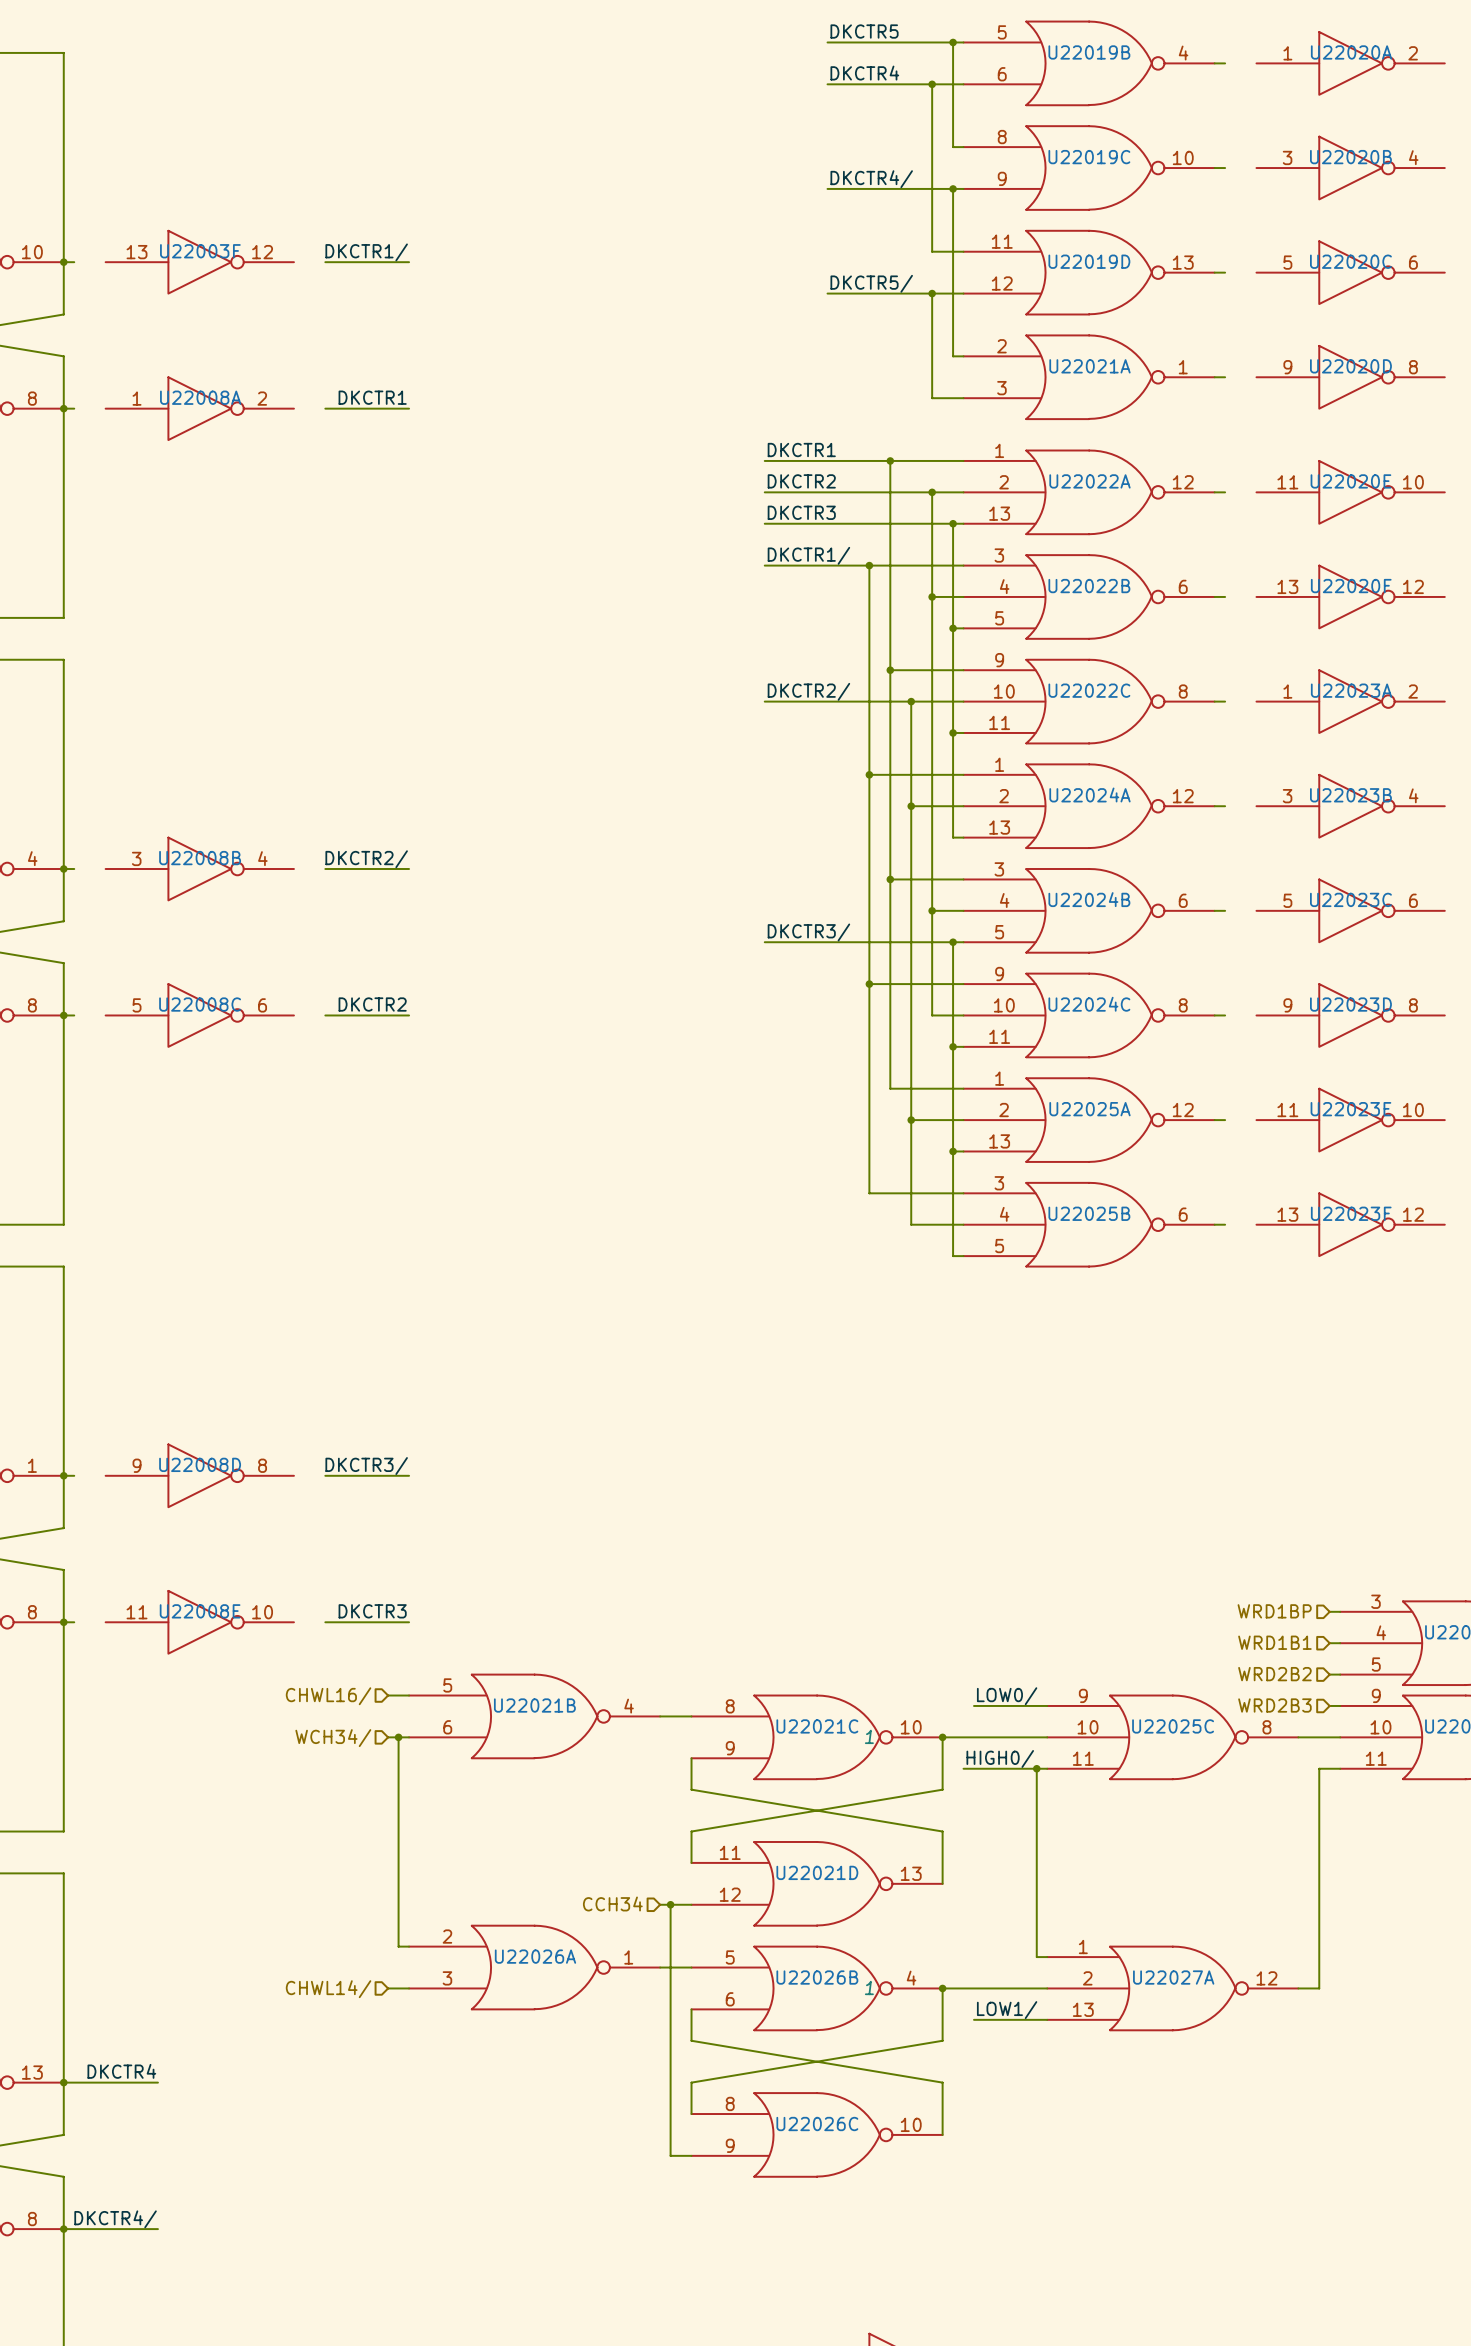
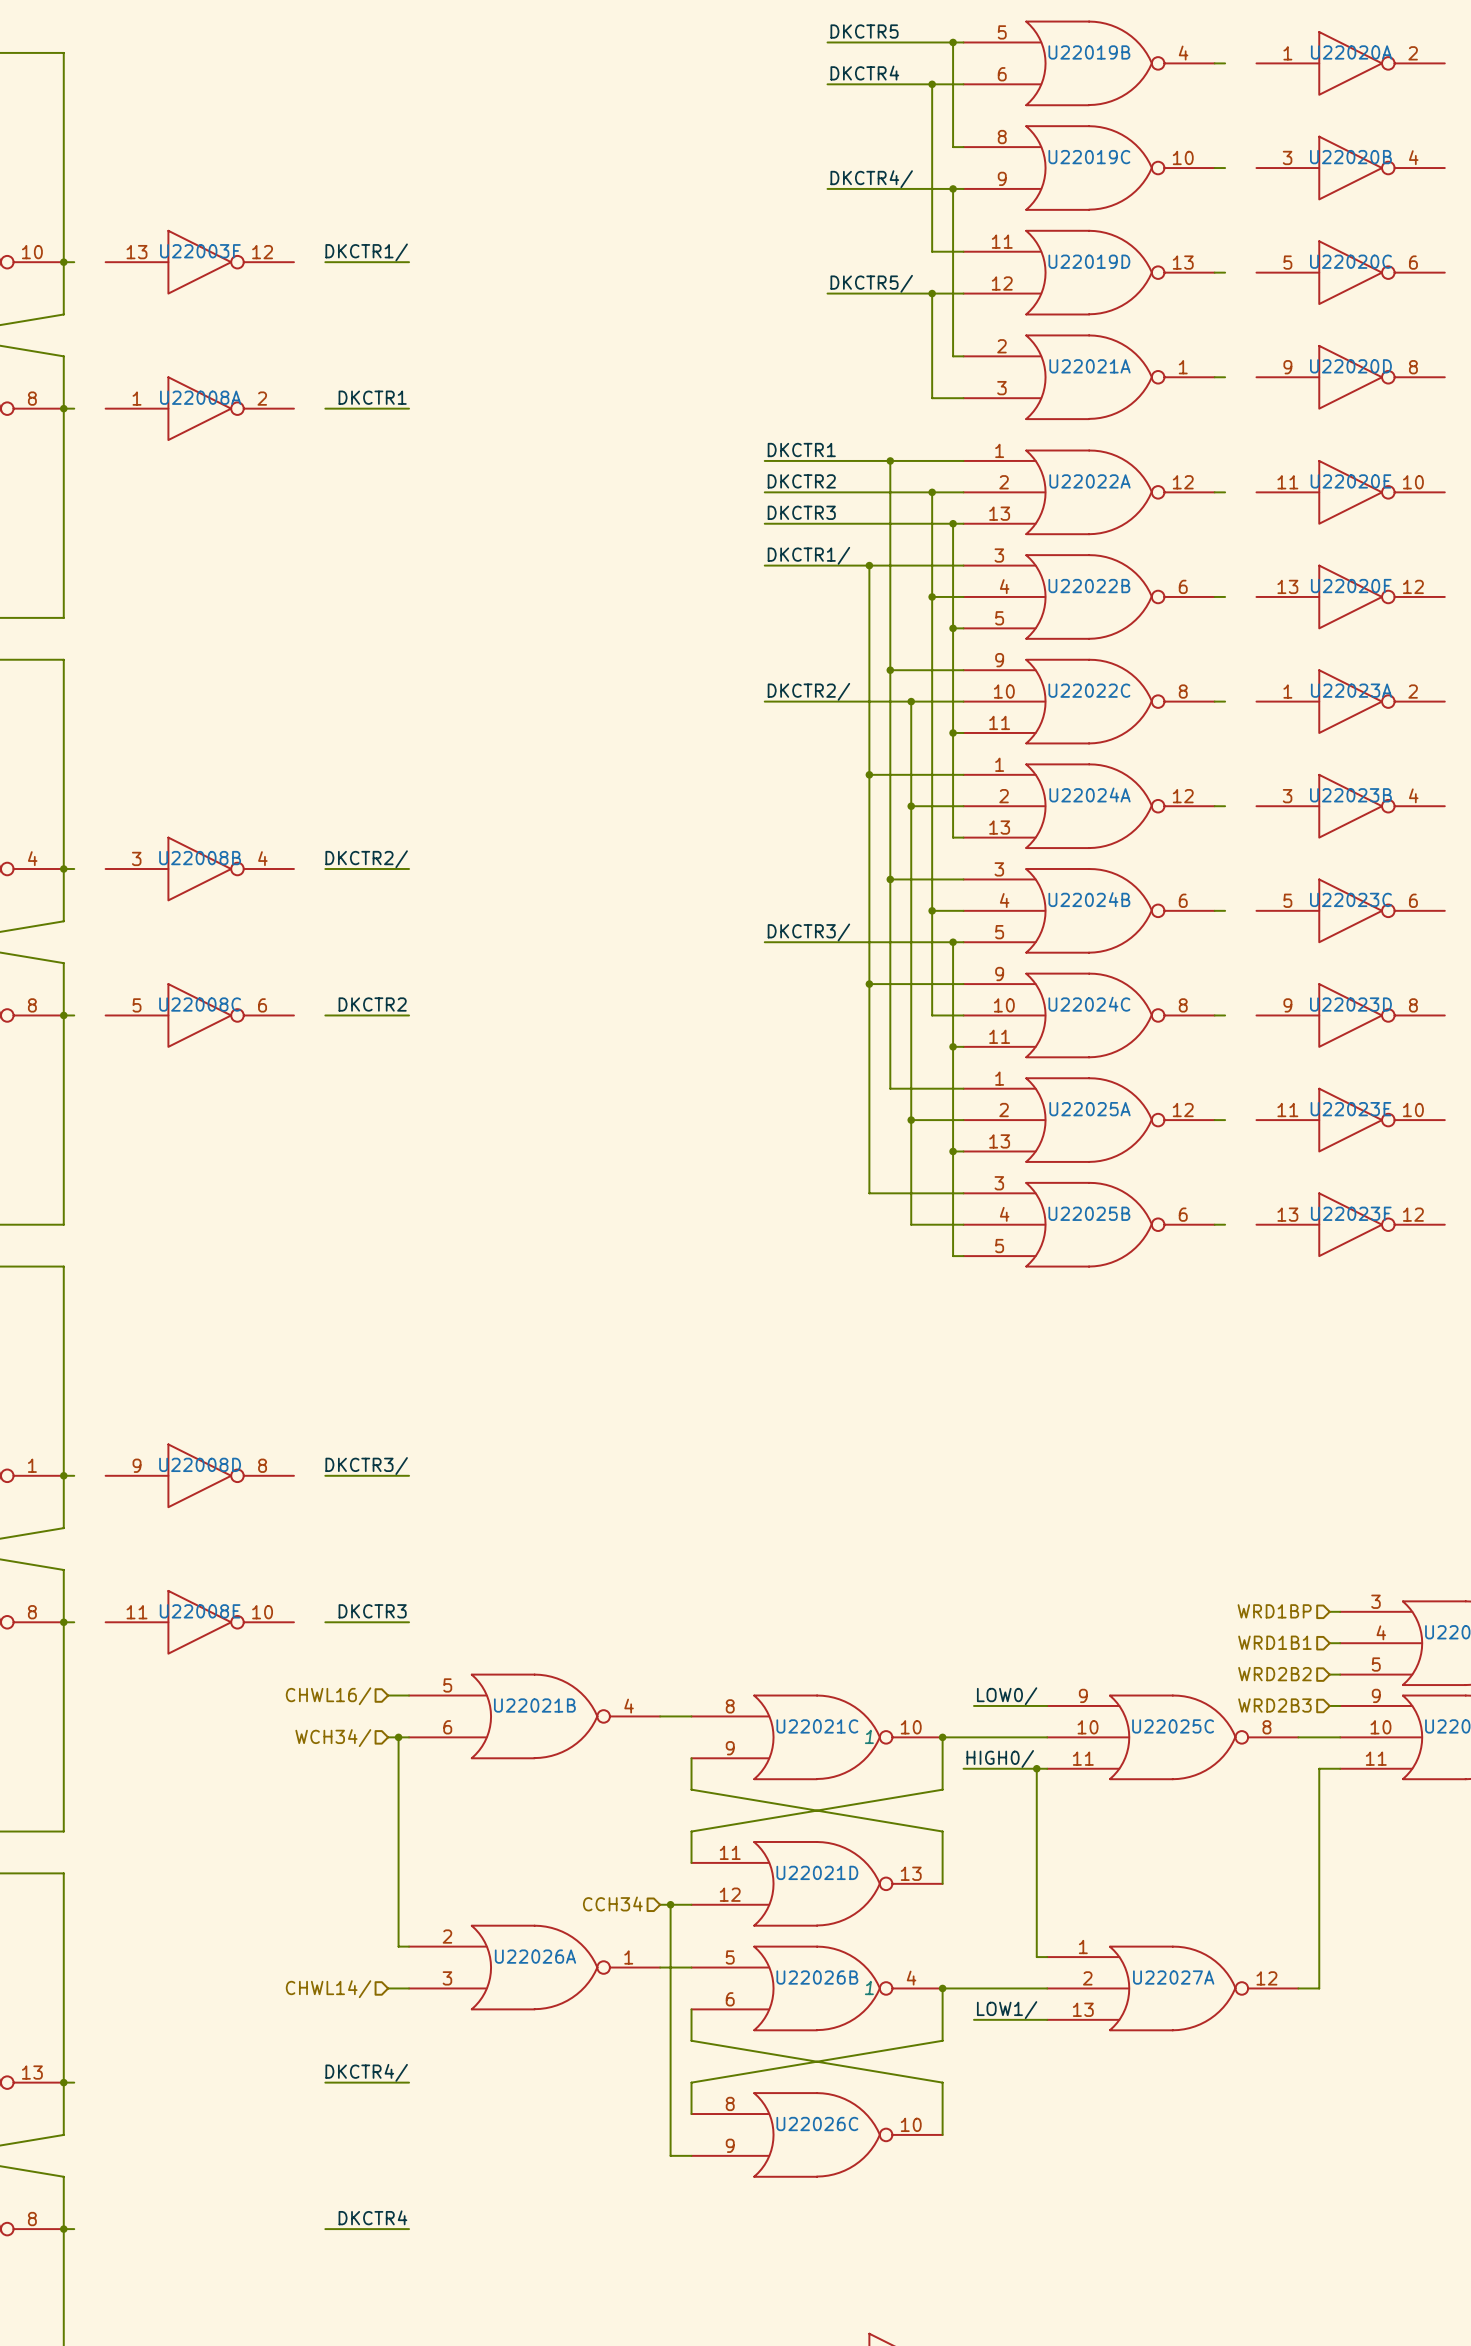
label: DKCTR4 (121, 2071) -> none
label: none -> DKCTR4/ (366, 2072)
wire: (74, 2082) (157, 2082) -> none
wire: none -> (325, 2082) (409, 2082)
label: none -> DKCTR4 (372, 2217)
label: DKCTR4/ (115, 2219) -> none
wire: (74, 2229) (157, 2229) -> none
wire: none -> (325, 2229) (409, 2229)

